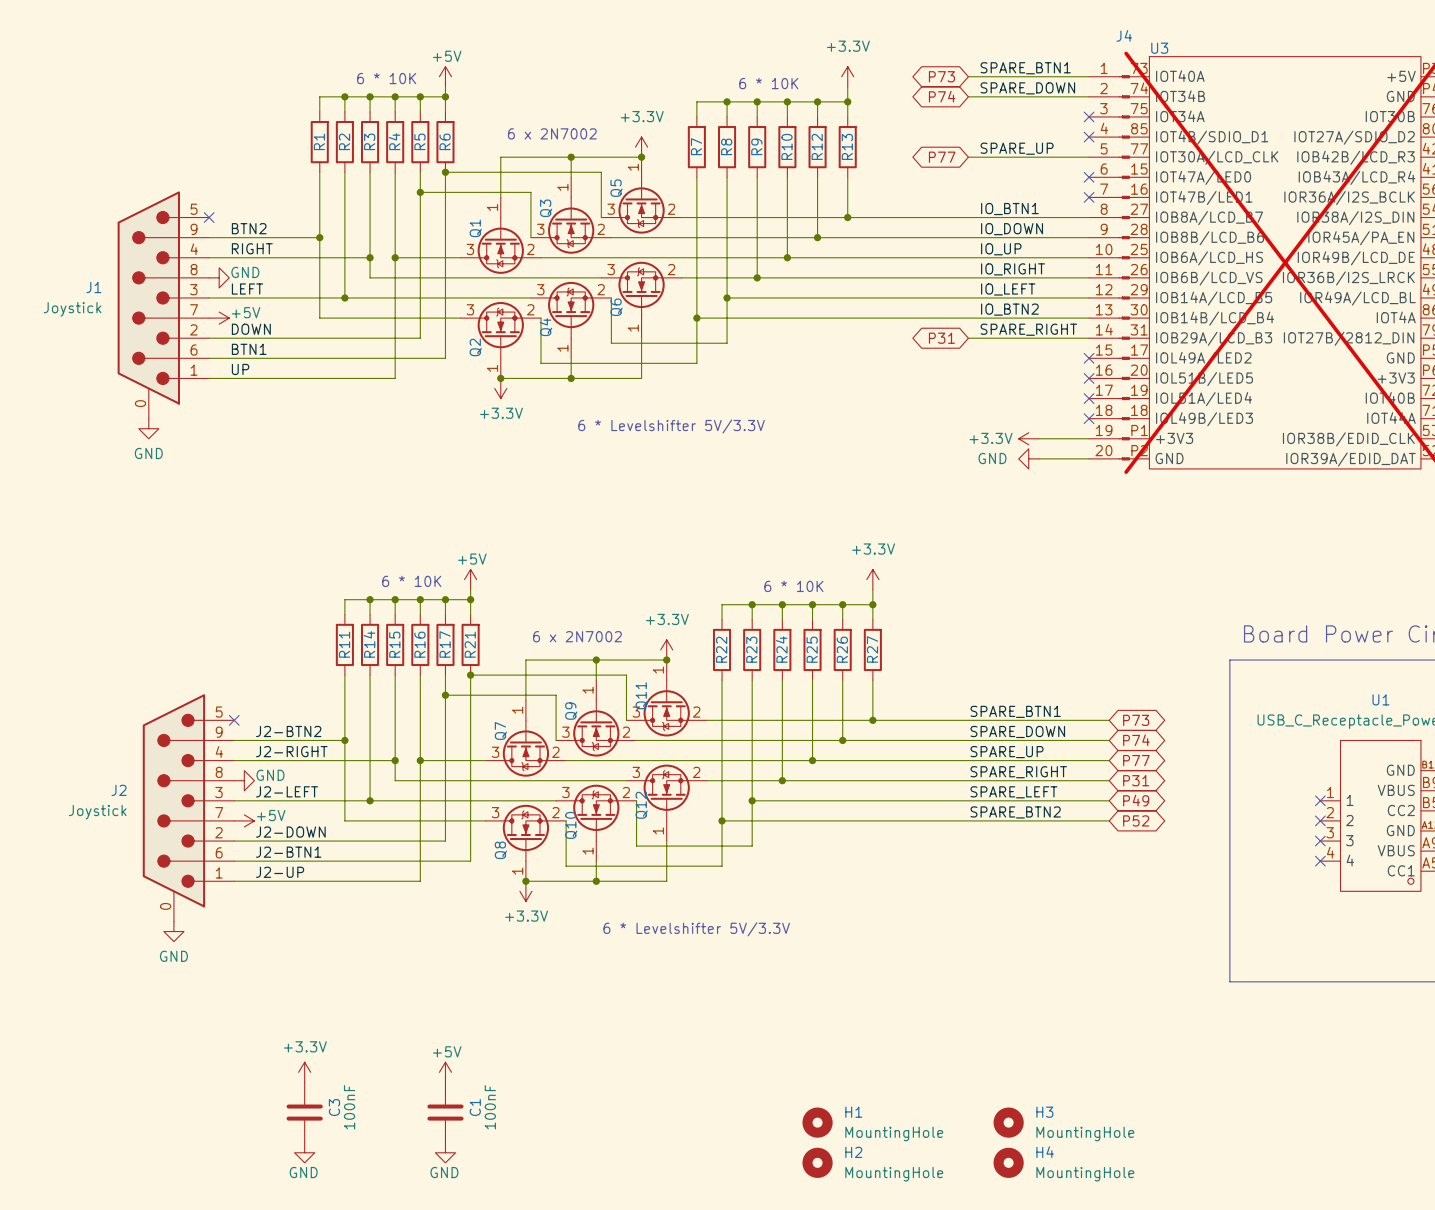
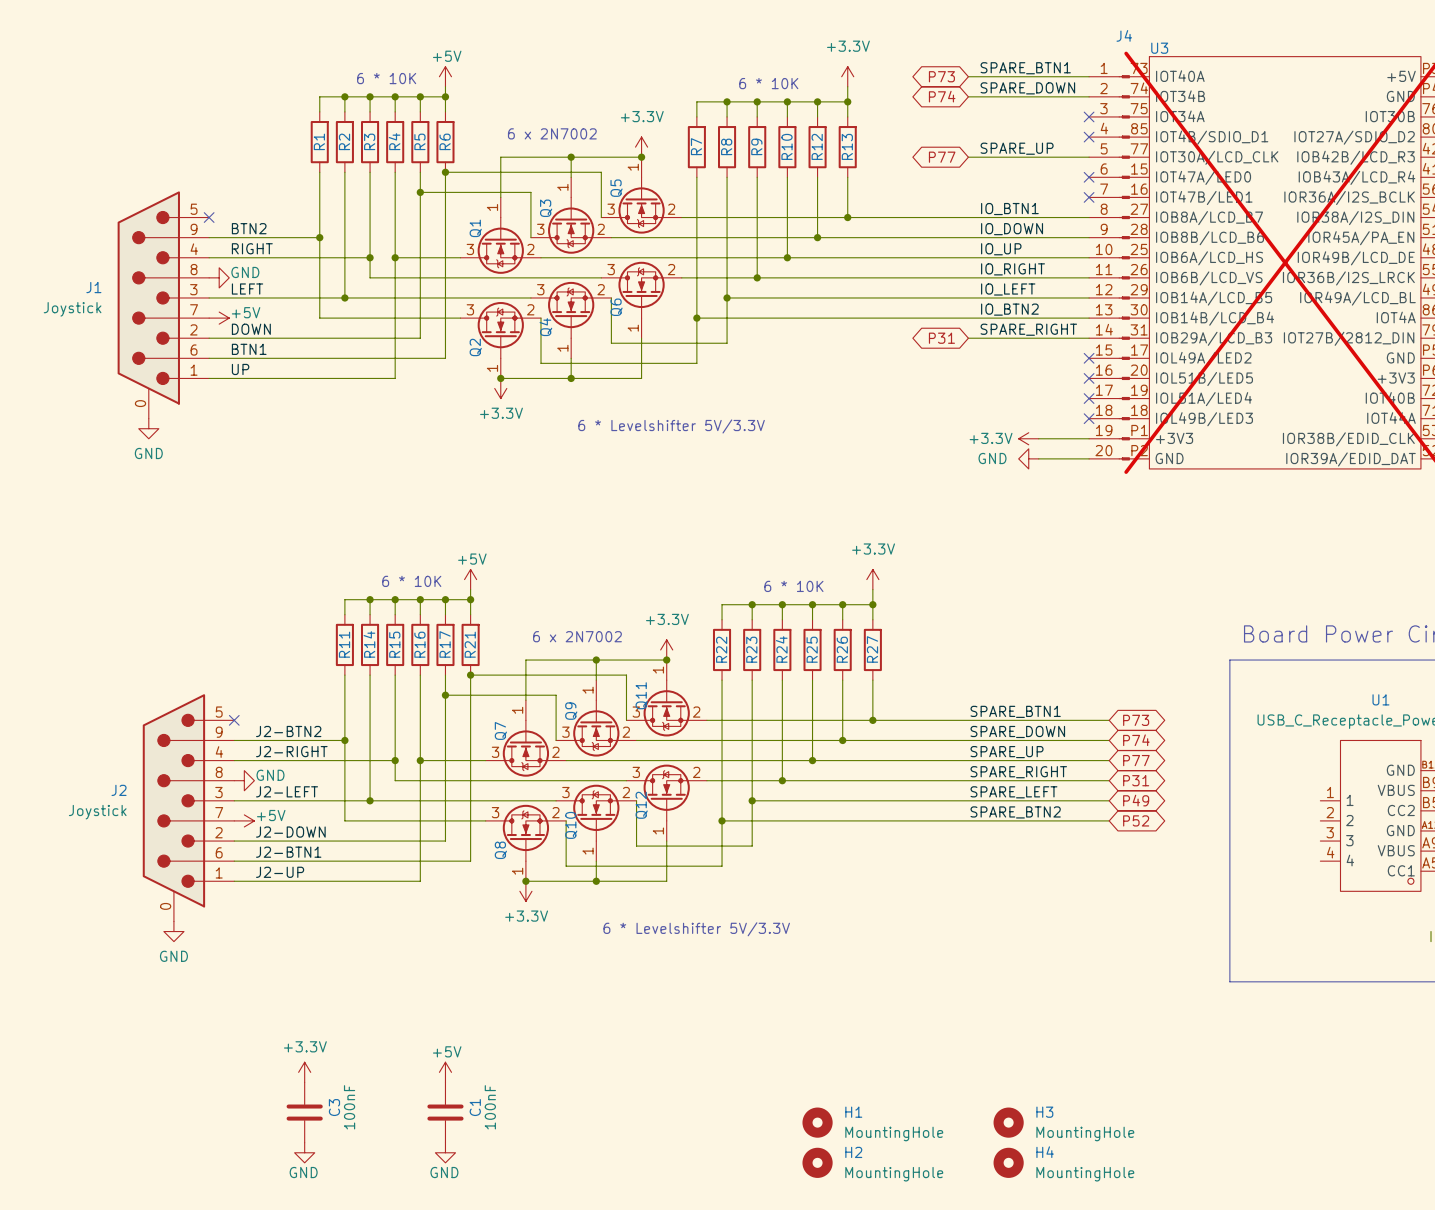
no-connect mark: (1320, 800) -> none
no-connect mark: (1320, 820) -> none
no-connect mark: (1320, 841) -> none
no-connect mark: (1320, 861) -> none
wire: none -> (1431, 931) (1431, 941)

